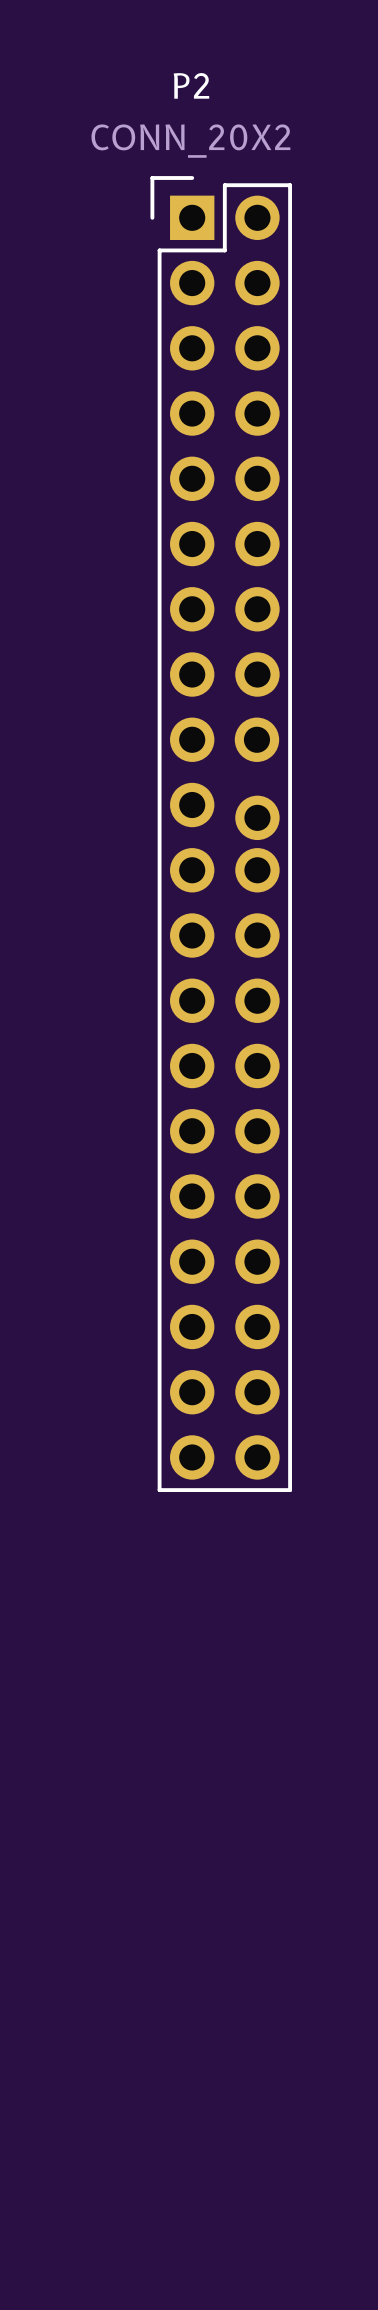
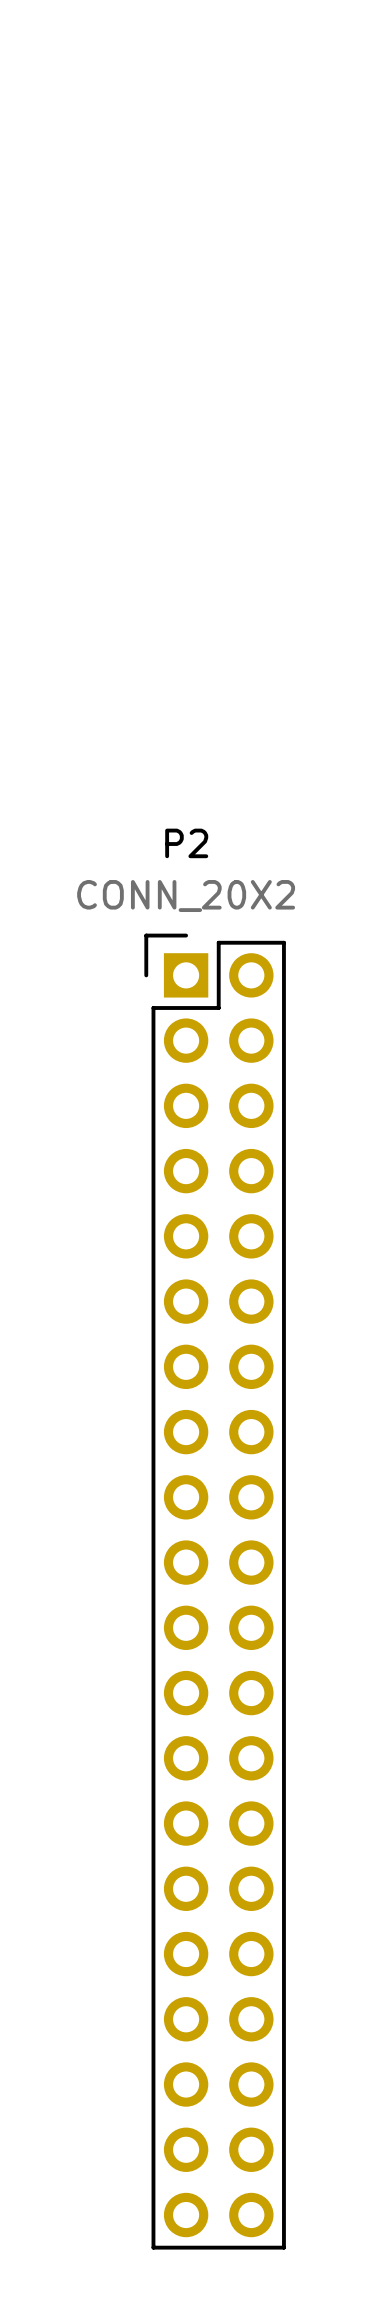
P2 footprint: [150, 176, 293, 1493] -> [144, 933, 286, 2250]

